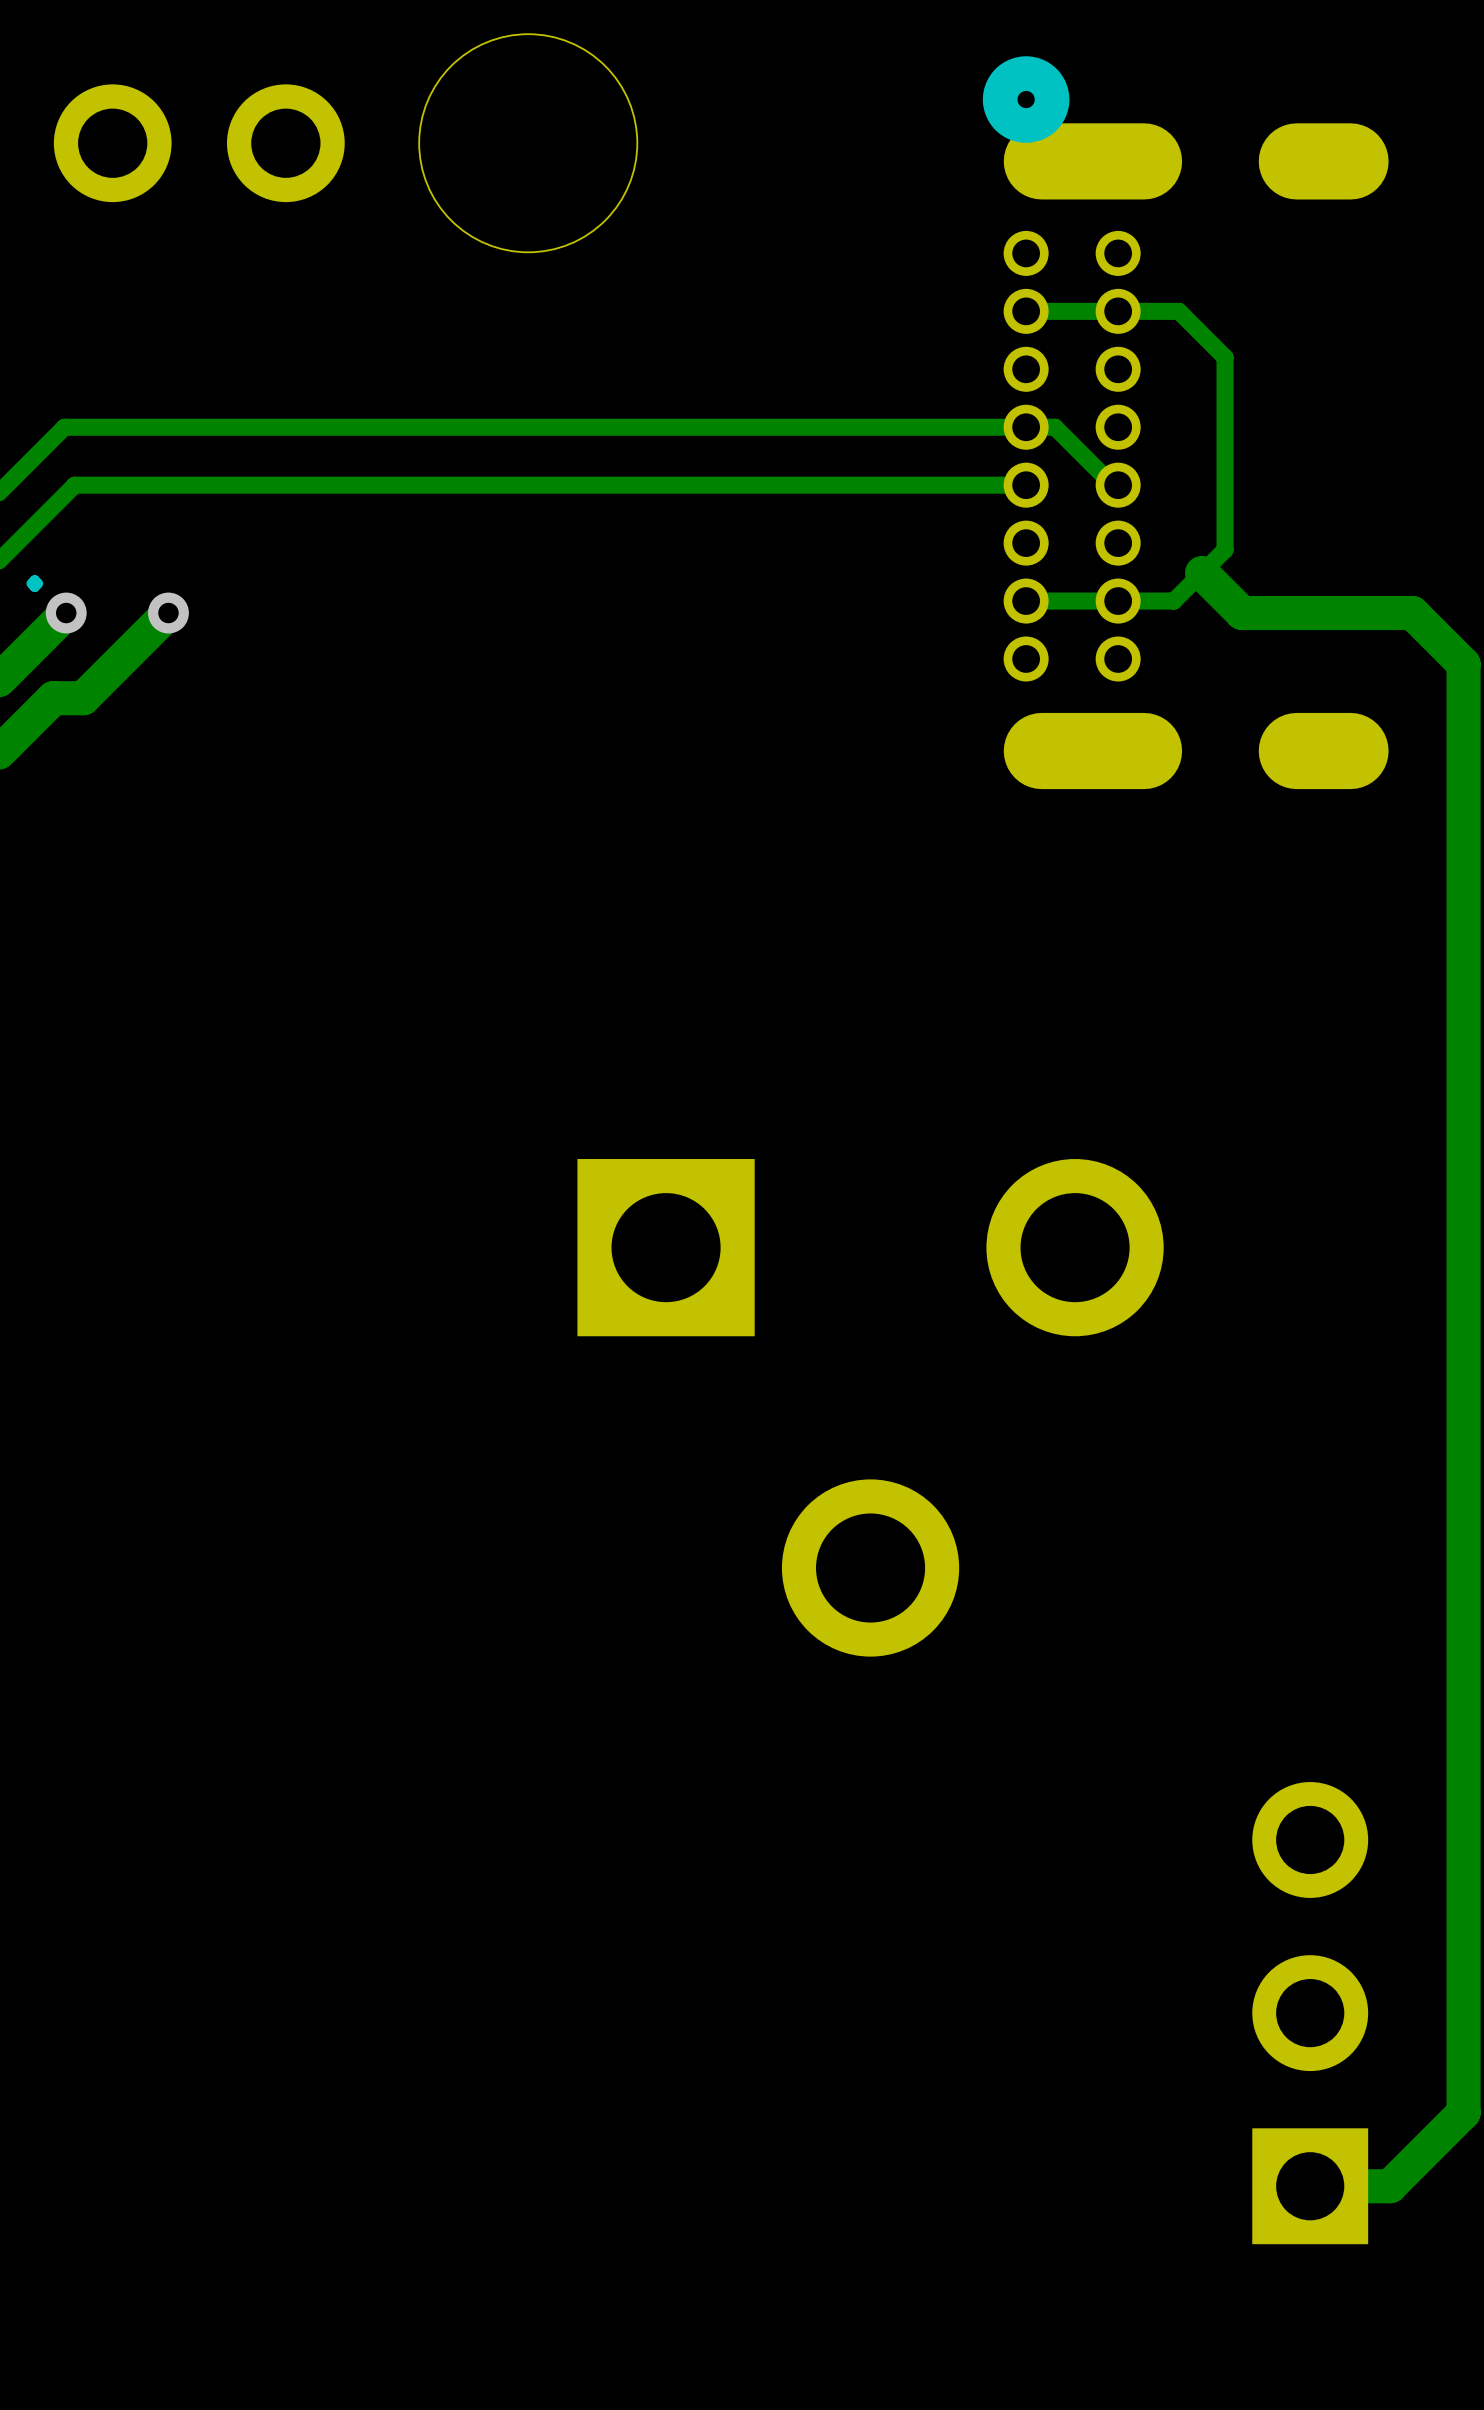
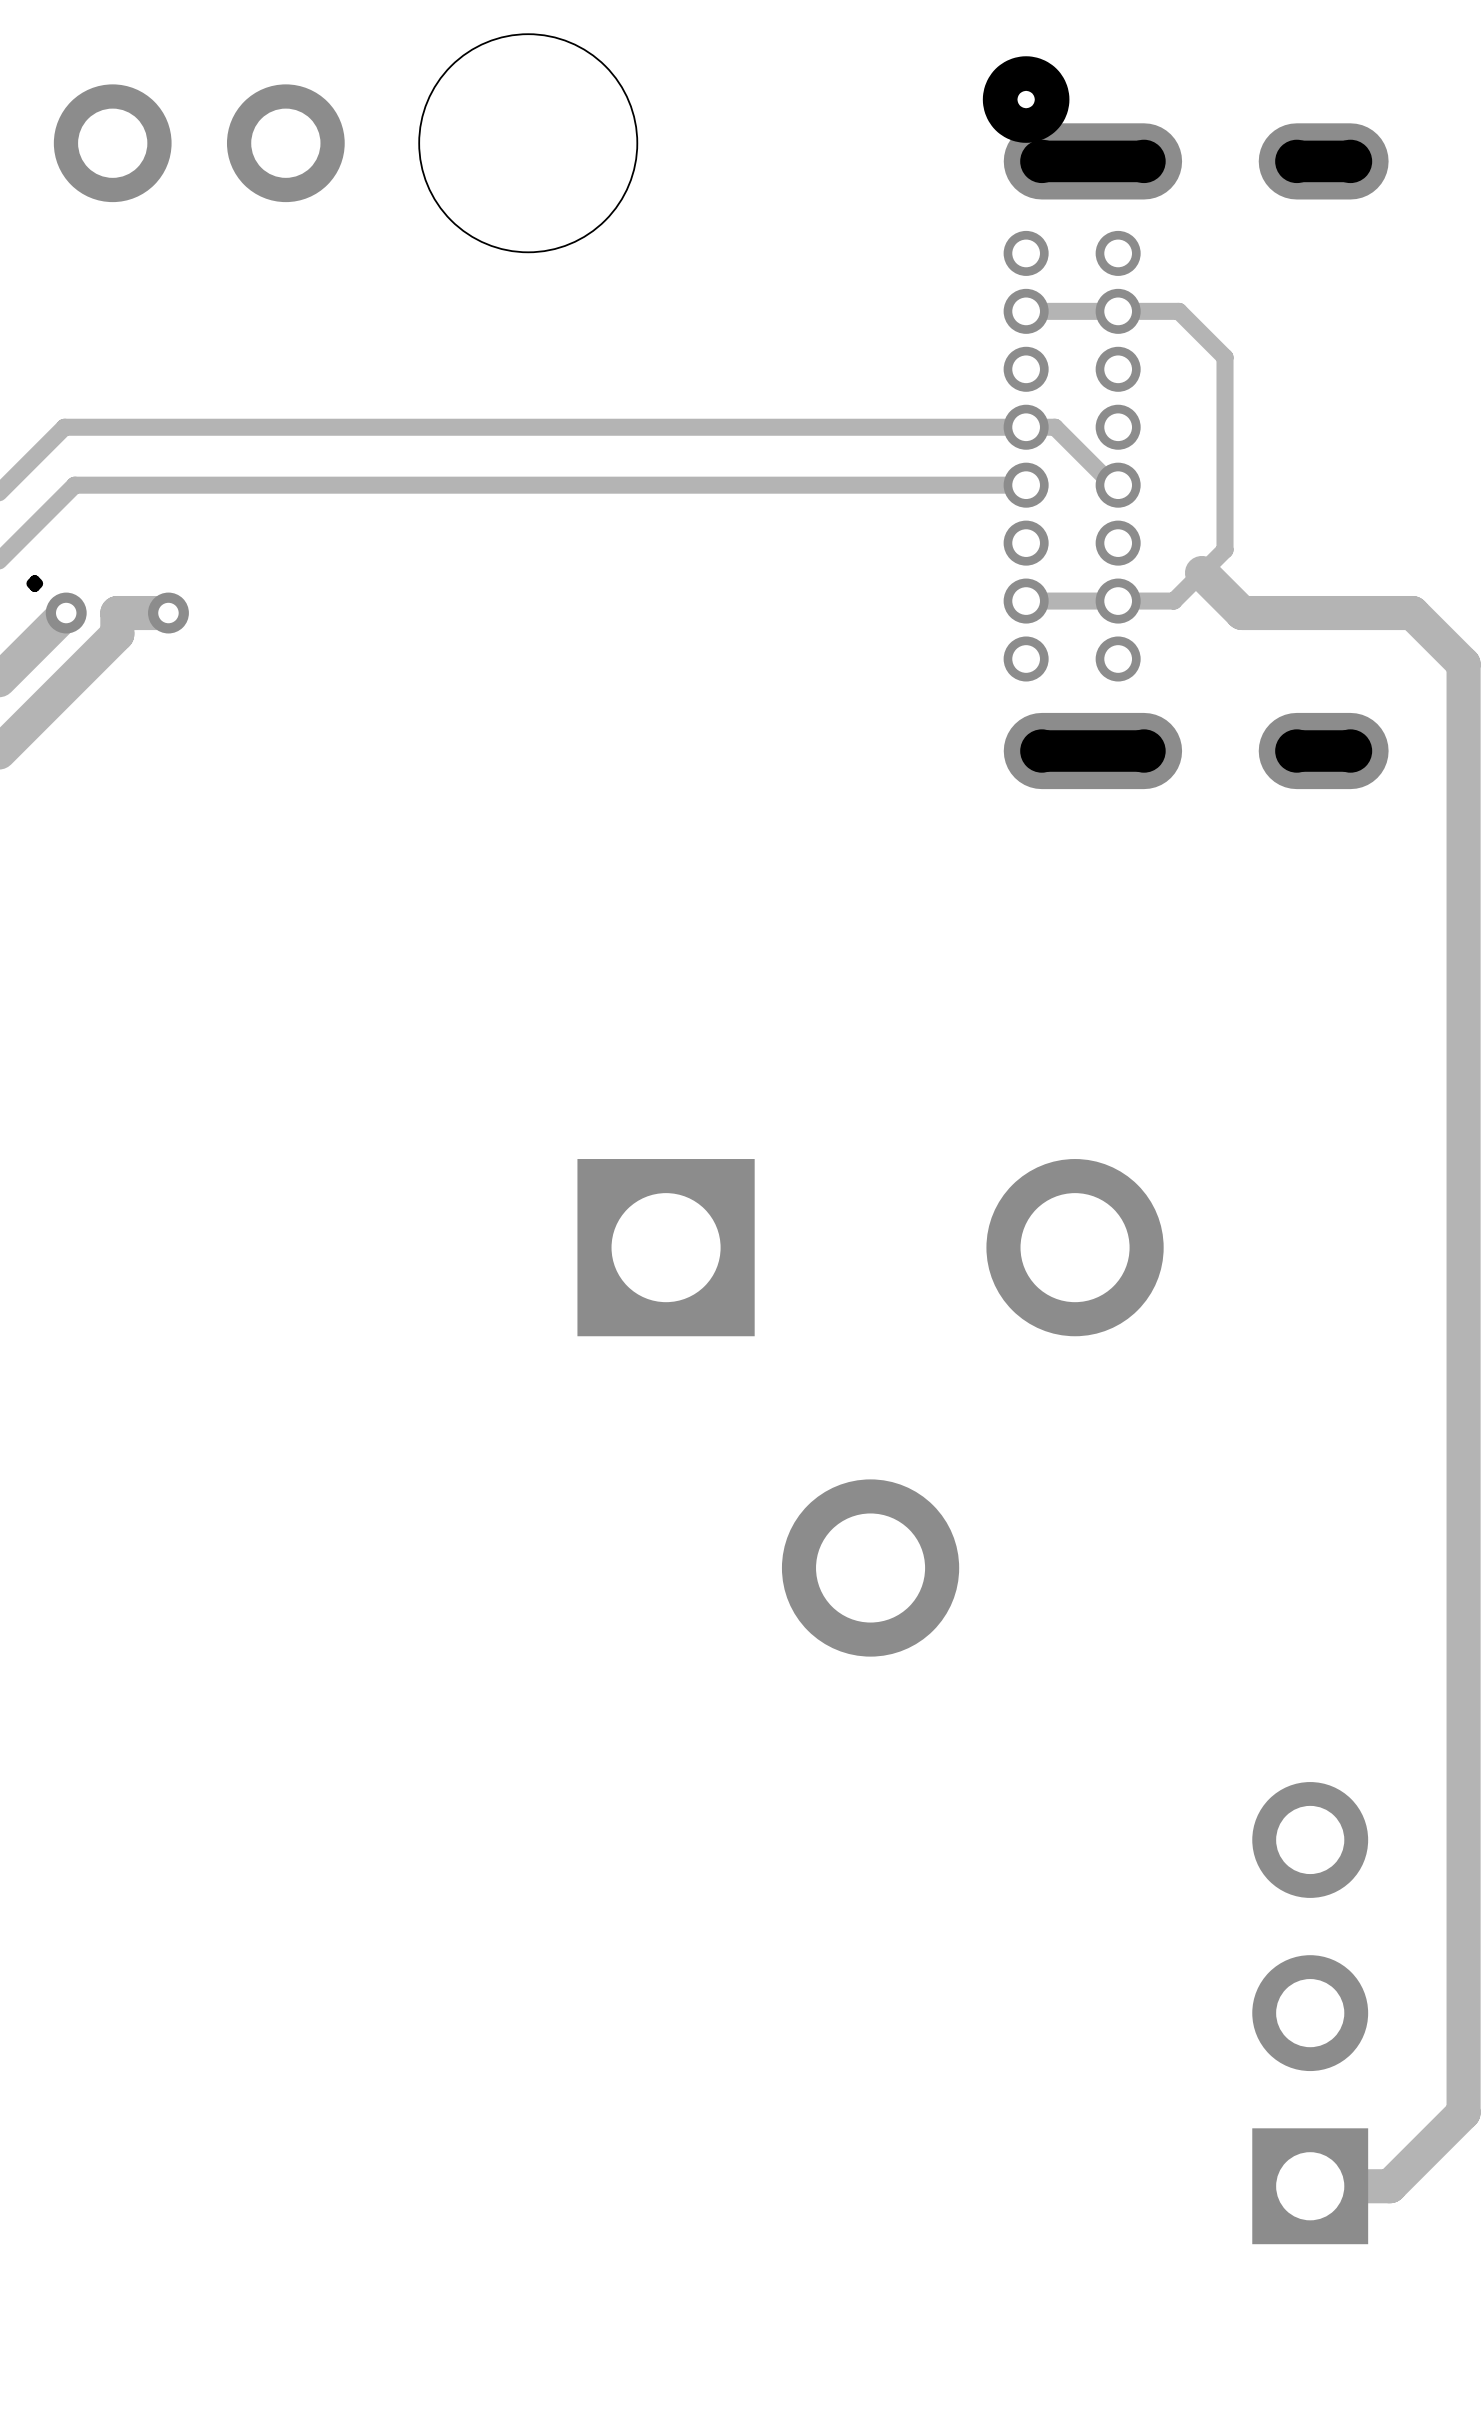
track: (168, 613) (83, 698) (53, 698) -> (168, 613) (117, 613) (117, 634) (53, 698)

